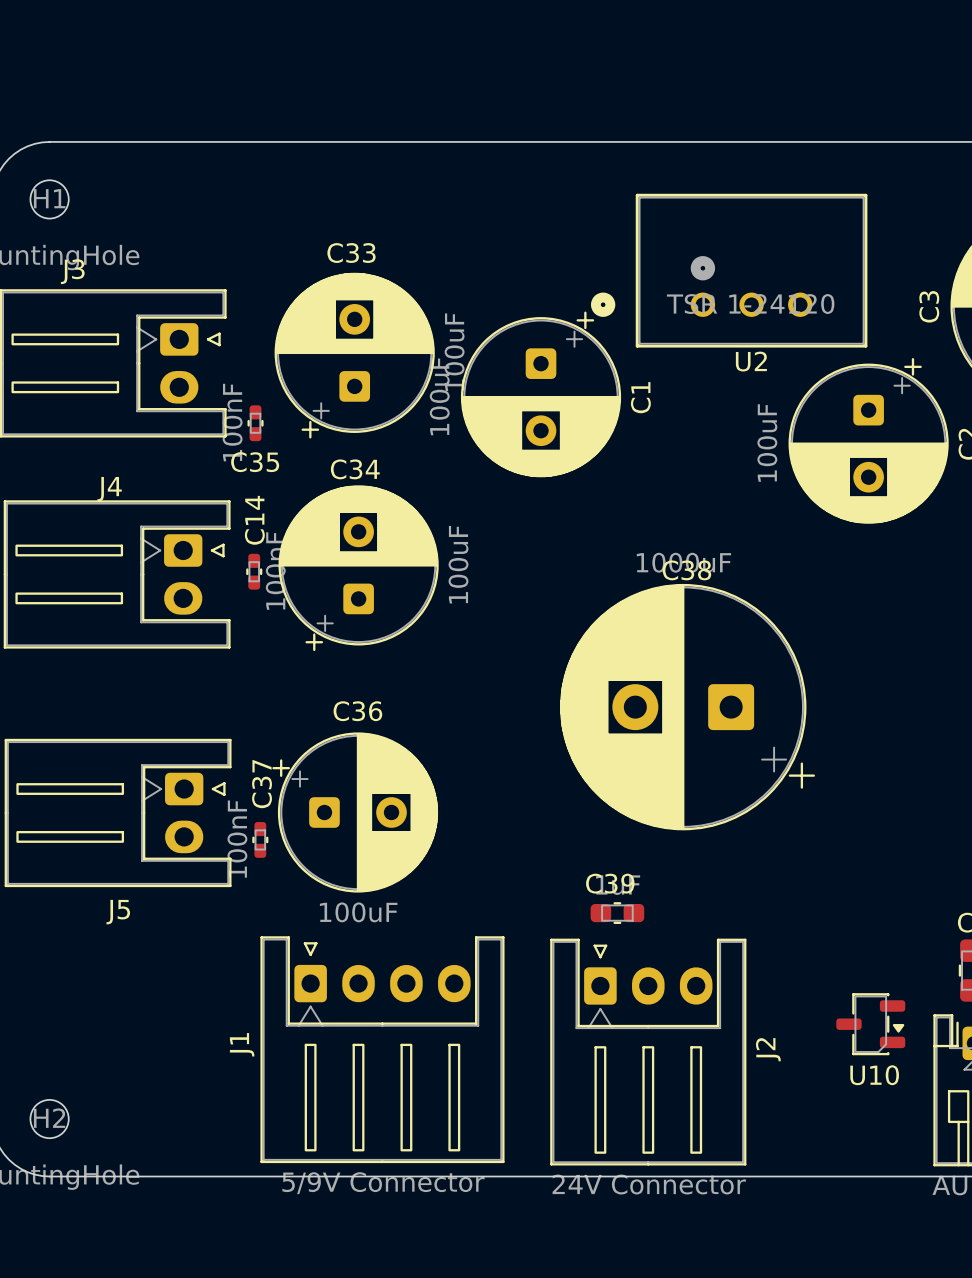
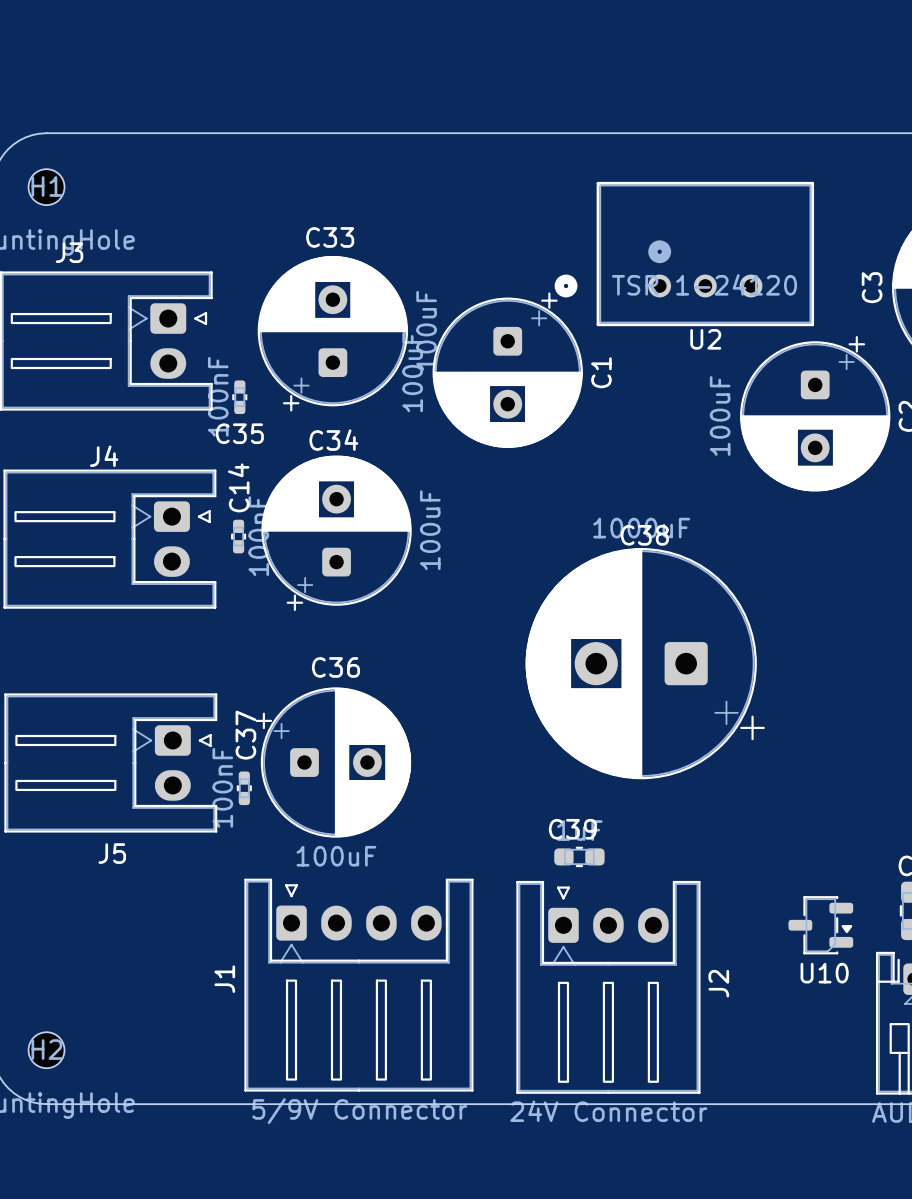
U10 position: (870, 1024) -> (820, 925)

